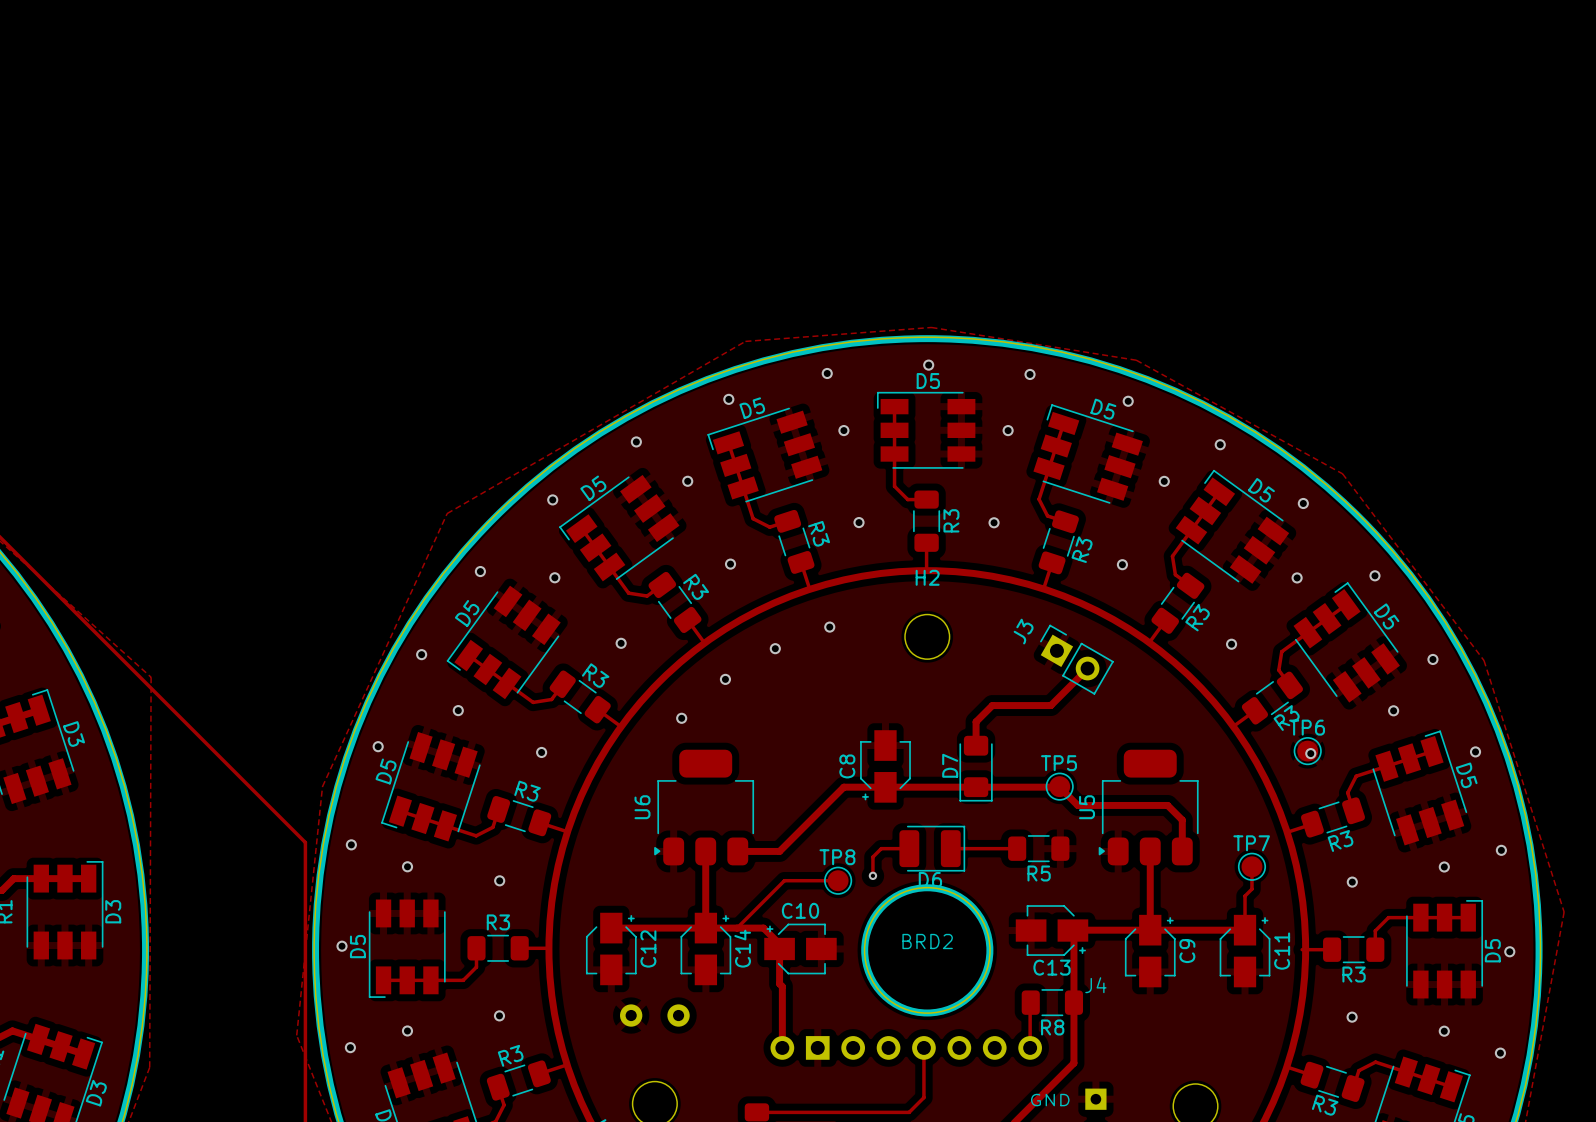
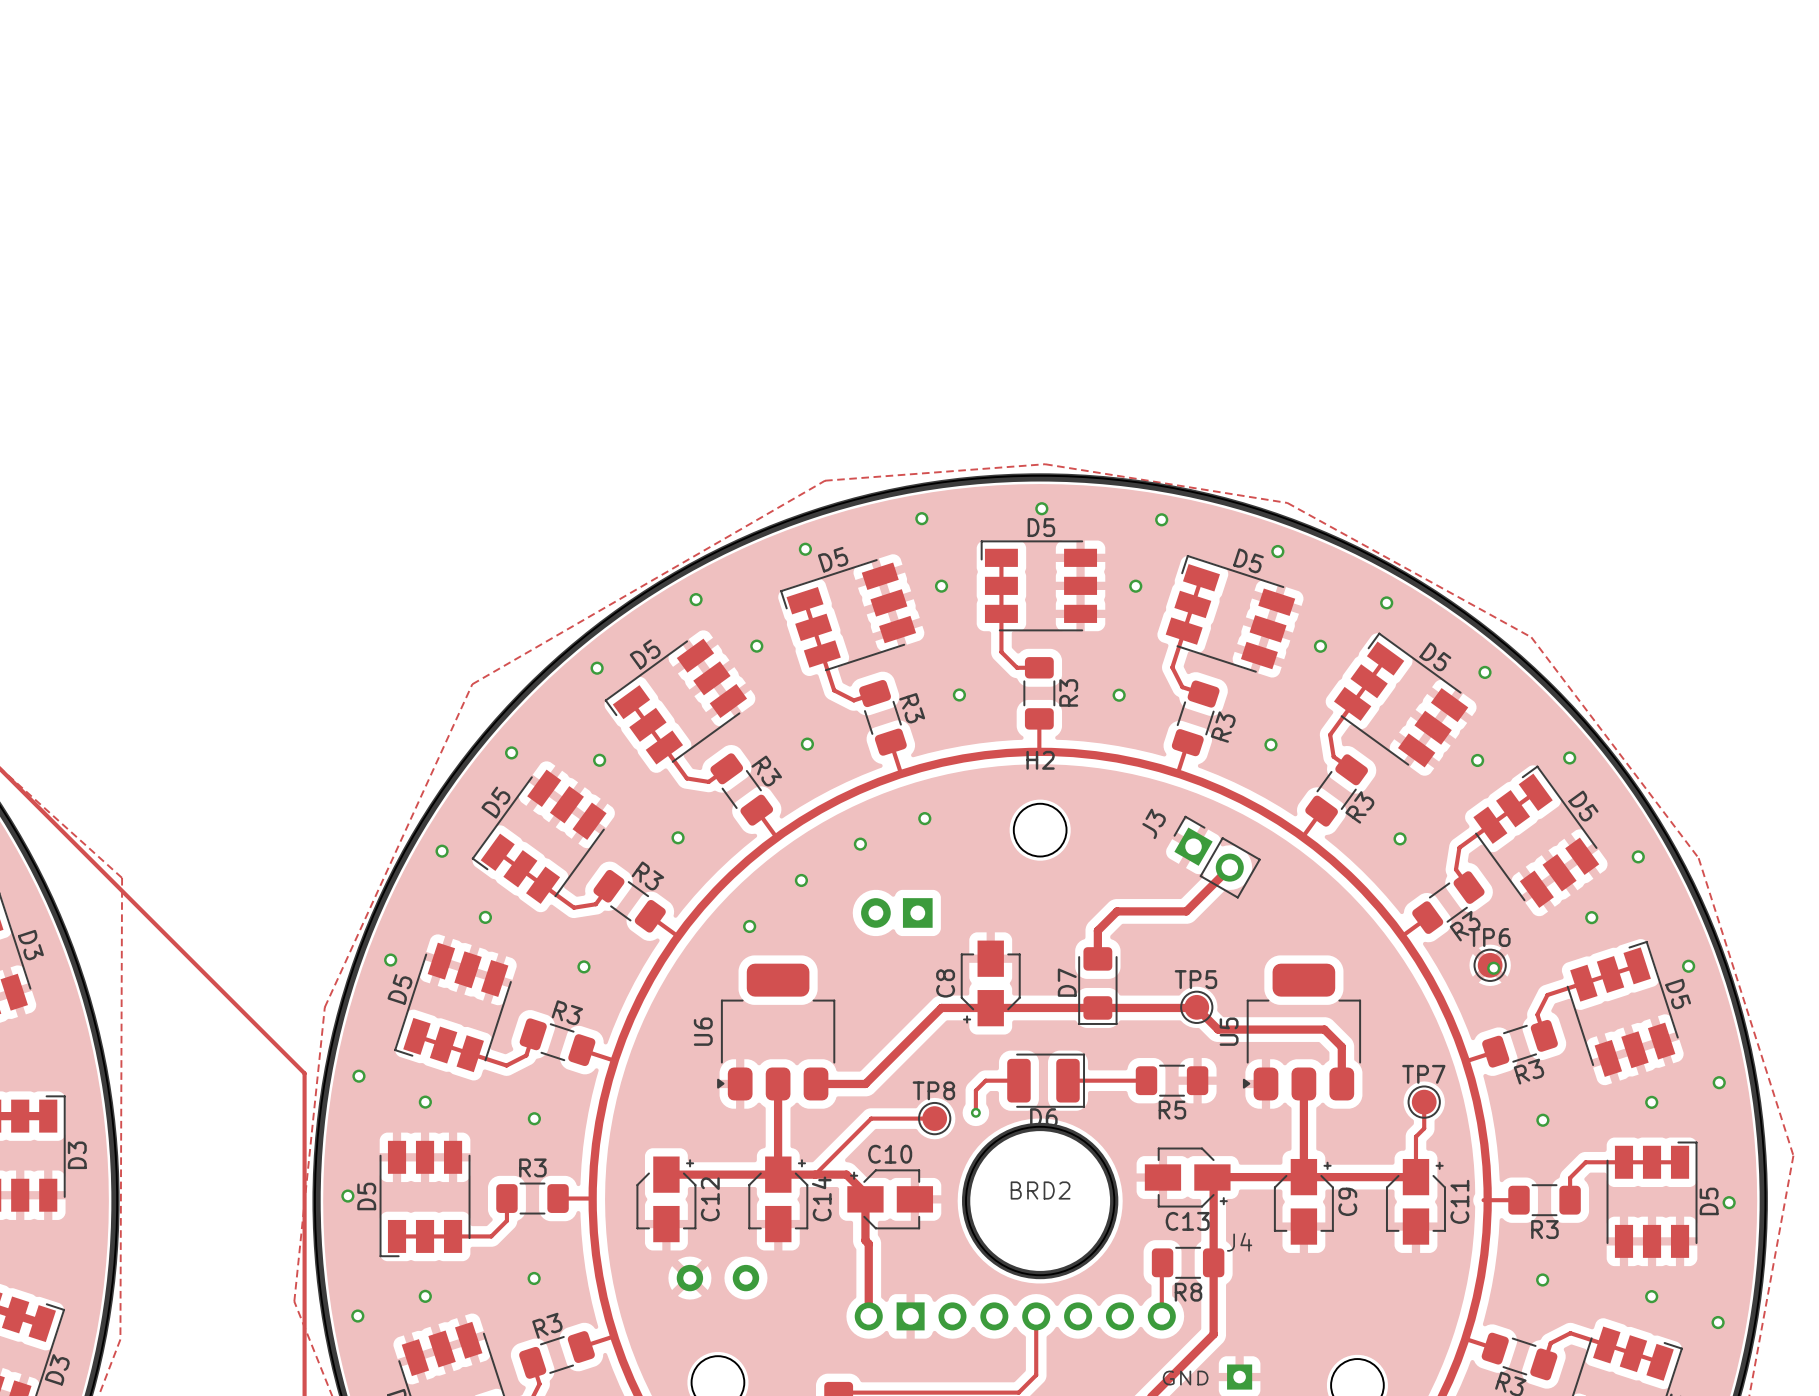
part: none -> (896, 912)

